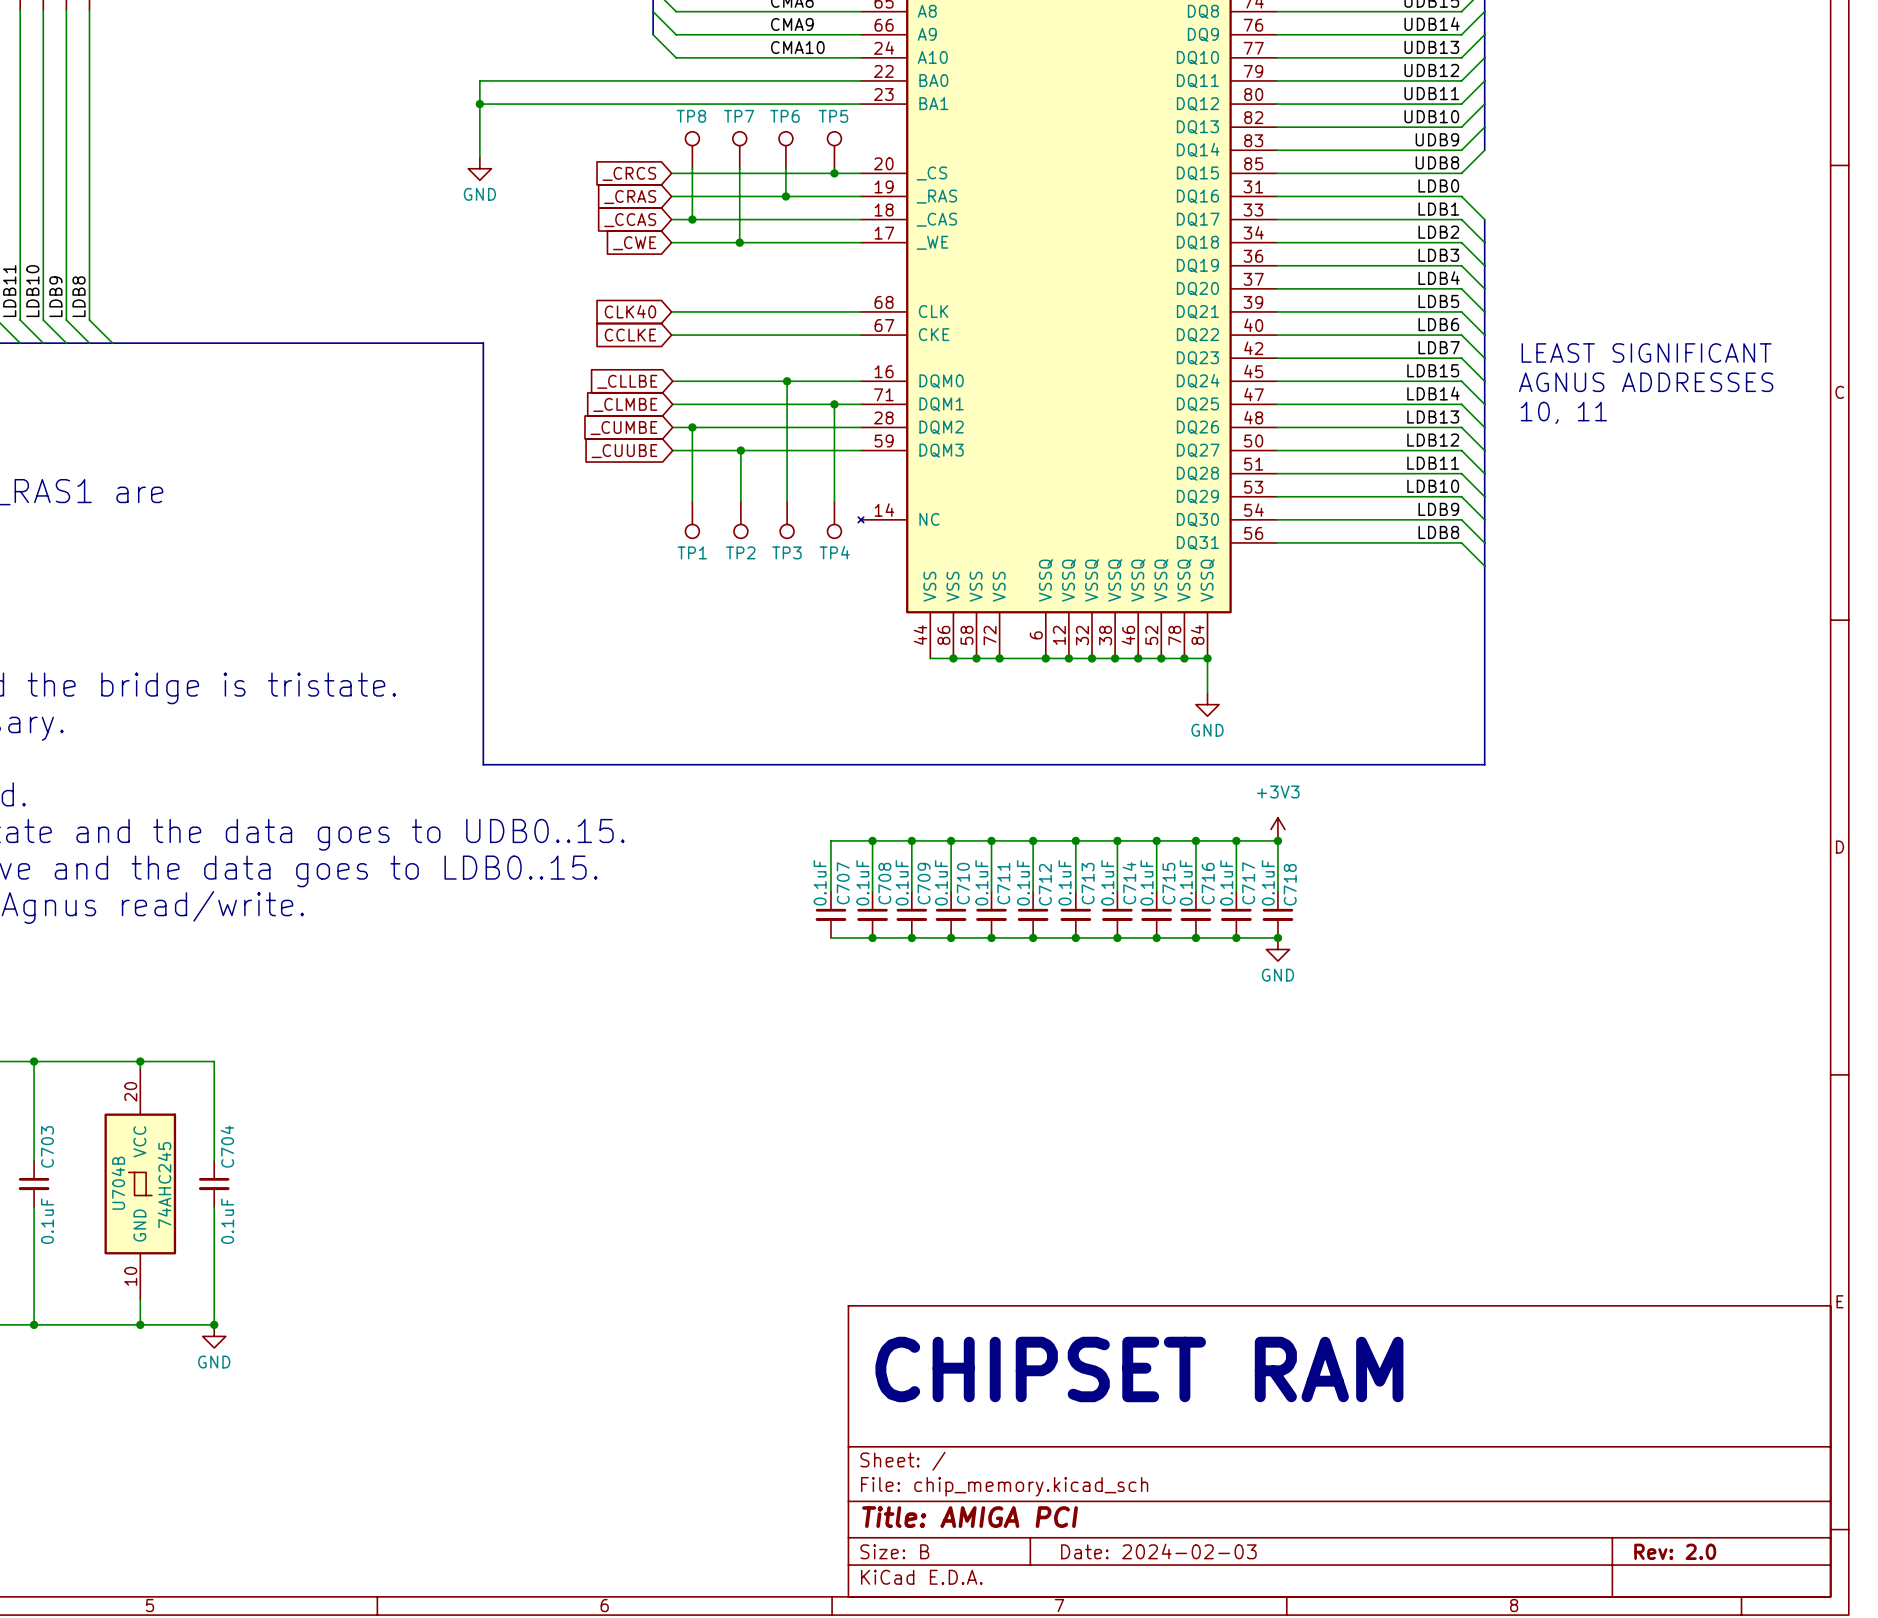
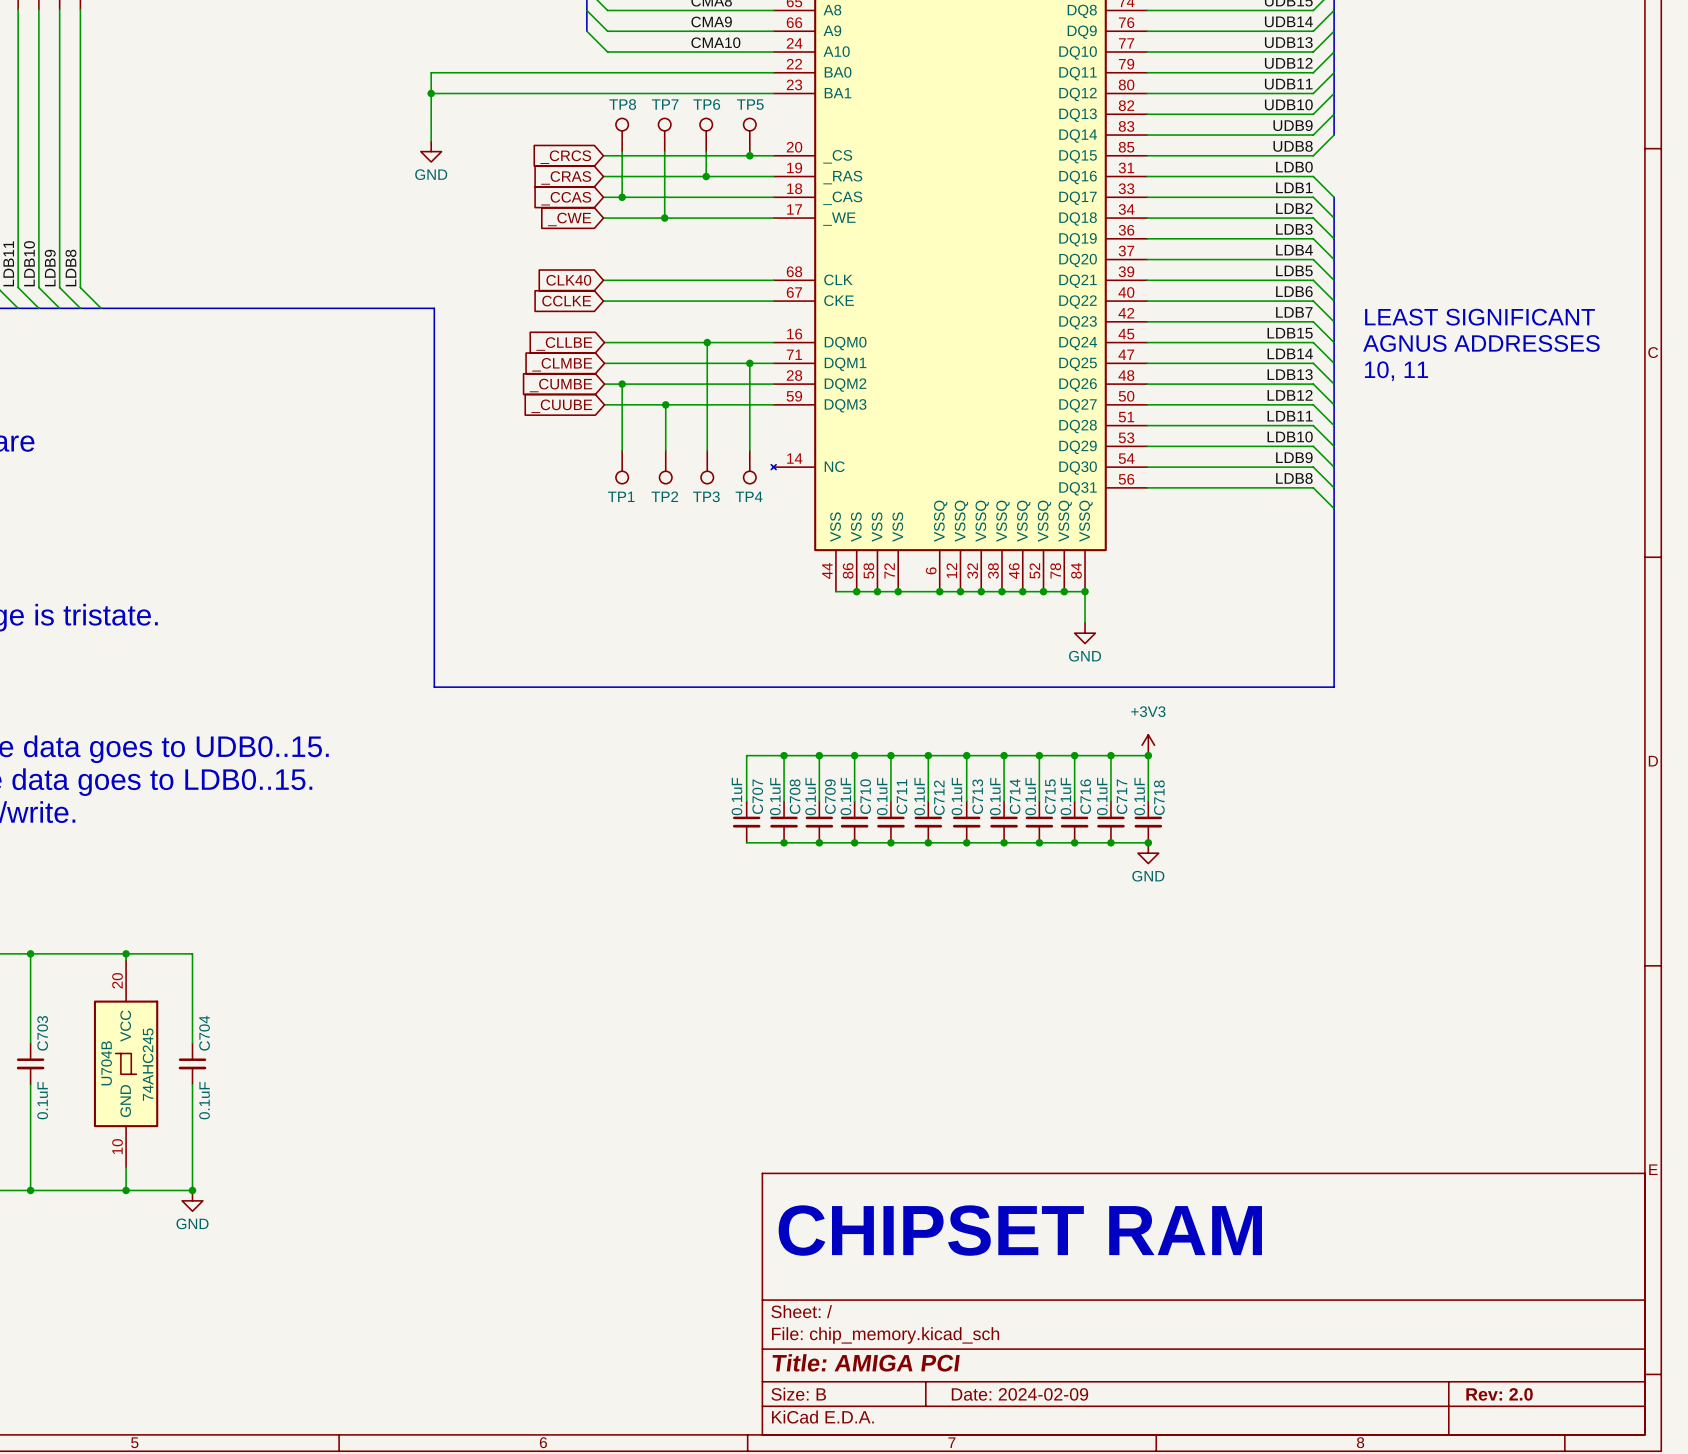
title block: Date: 2024-02-03 (1158, 1551) -> Date: 2024-02-09 (1019, 1394)

